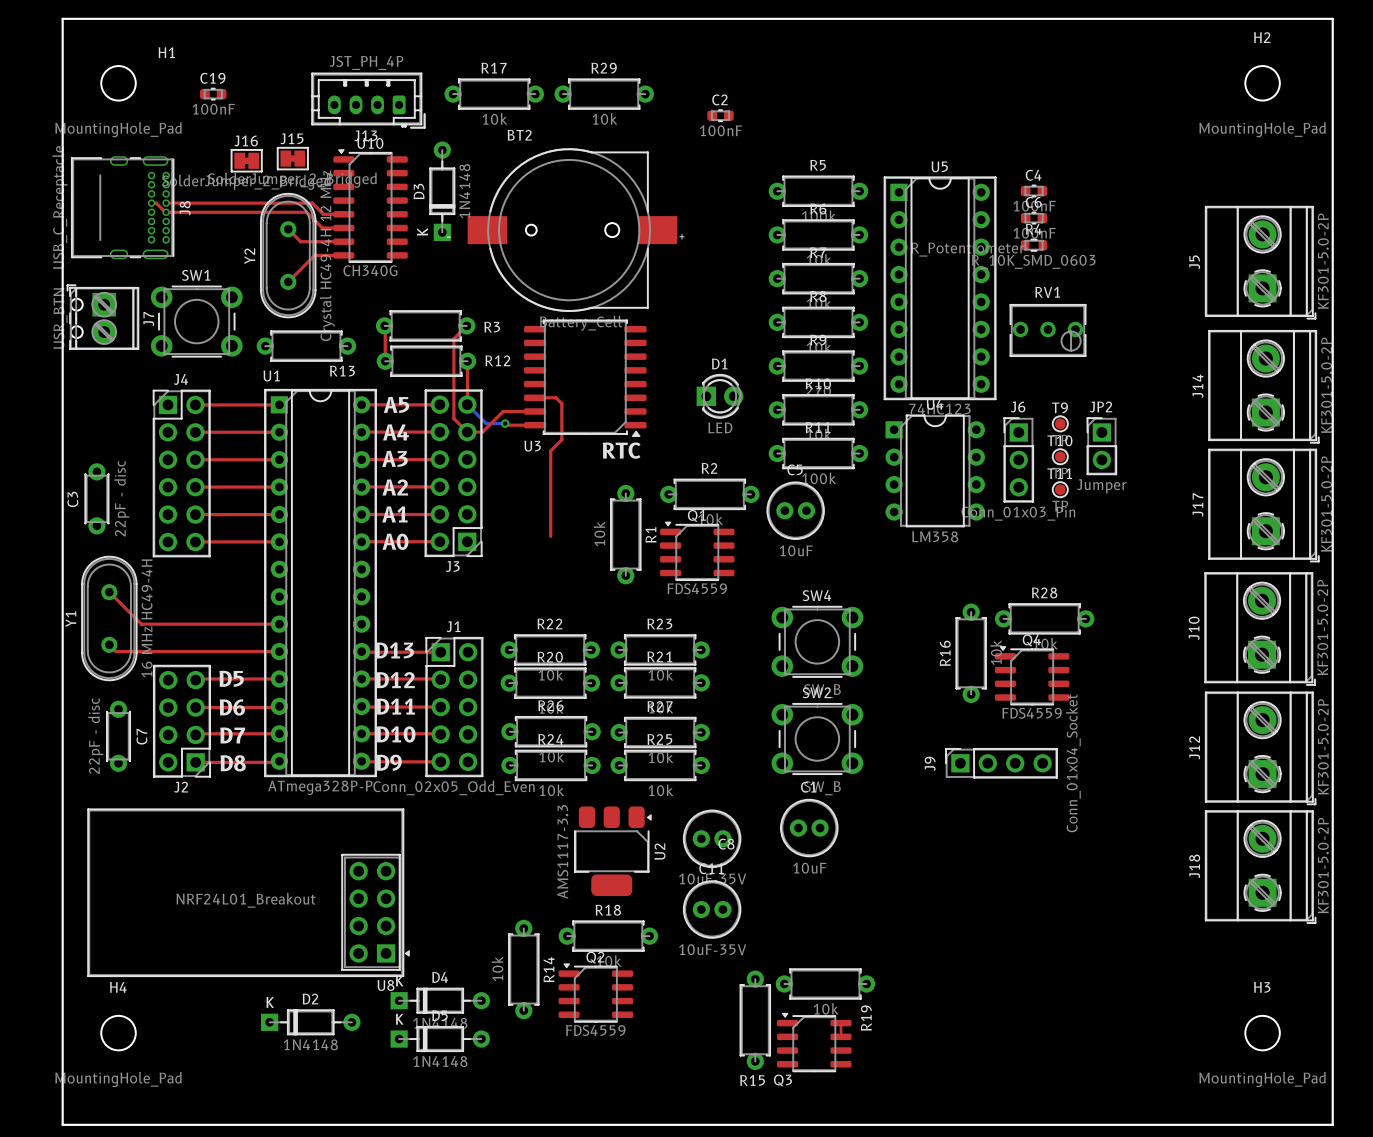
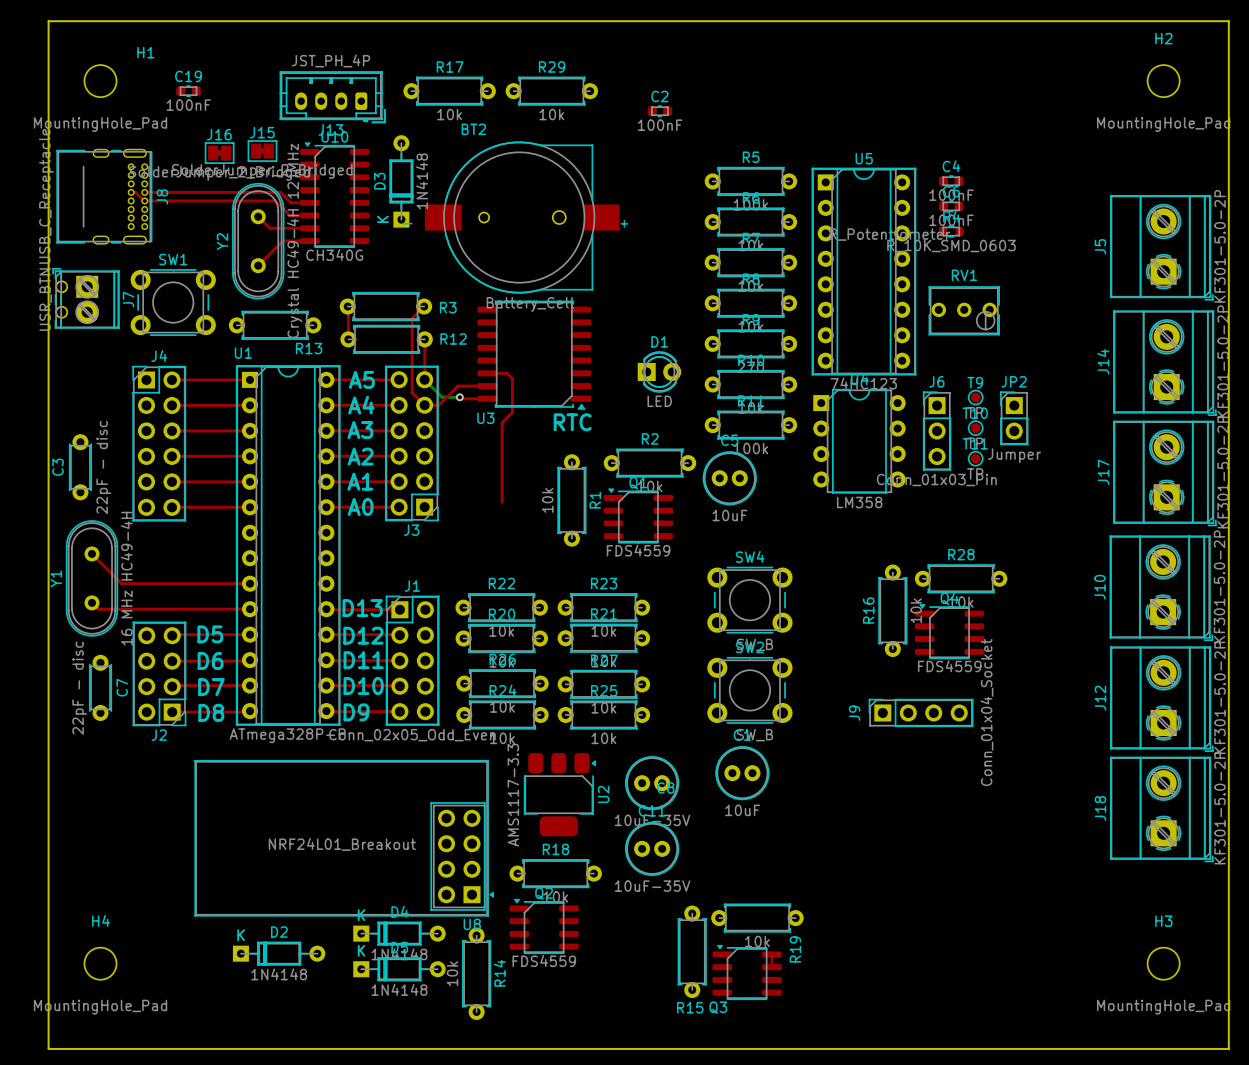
U8 position: (248, 892) -> (344, 838)
R14 position: (523, 969) -> (476, 973)

